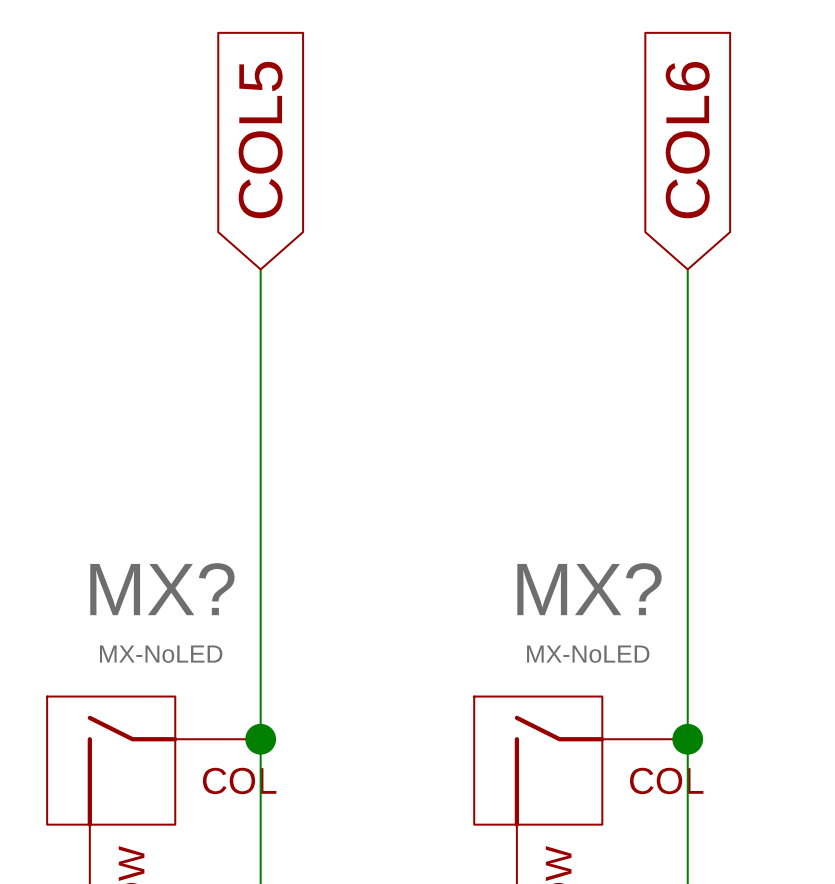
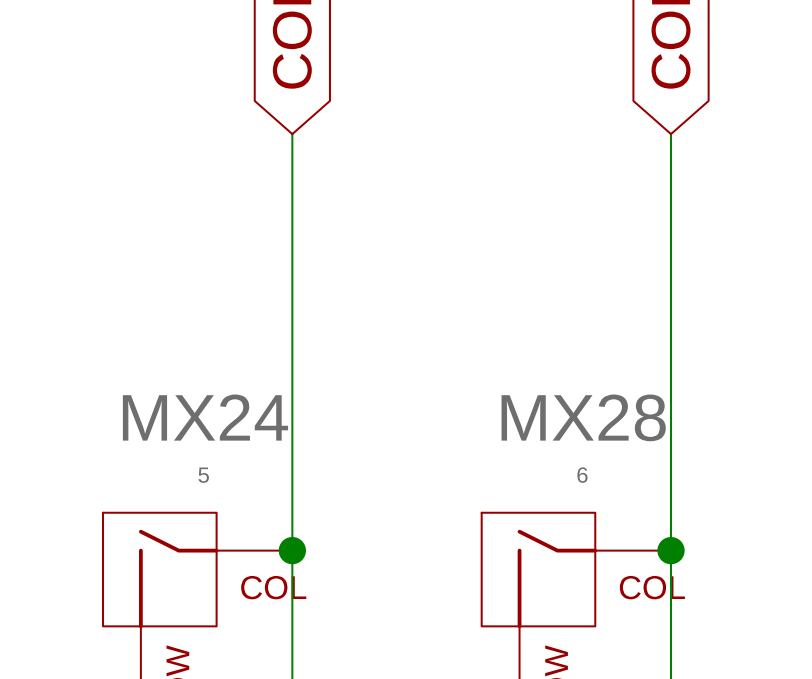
MX? name: MX? (162, 589) -> MX24 (205, 417)
MX? name: MX? (589, 589) -> MX28 (583, 417)
MX? value: MX-NoLED (161, 654) -> 5 (203, 475)
MX? value: MX-NoLED (588, 654) -> 6 (582, 475)

